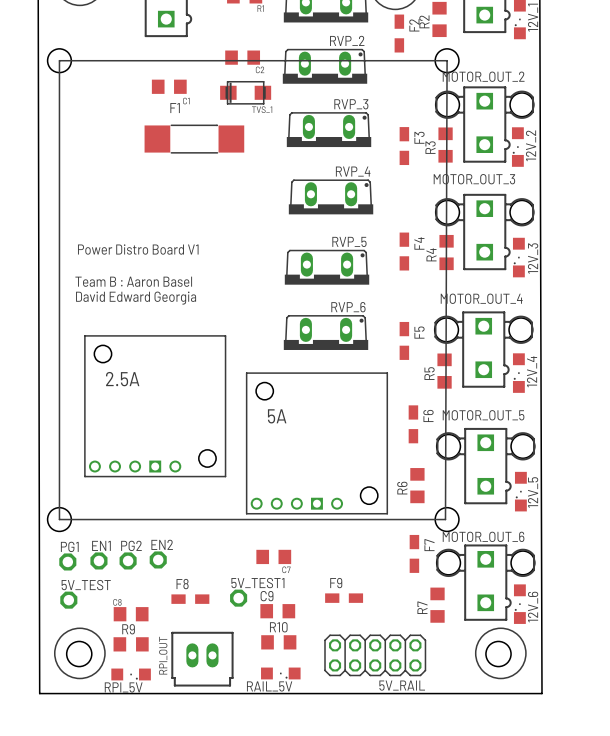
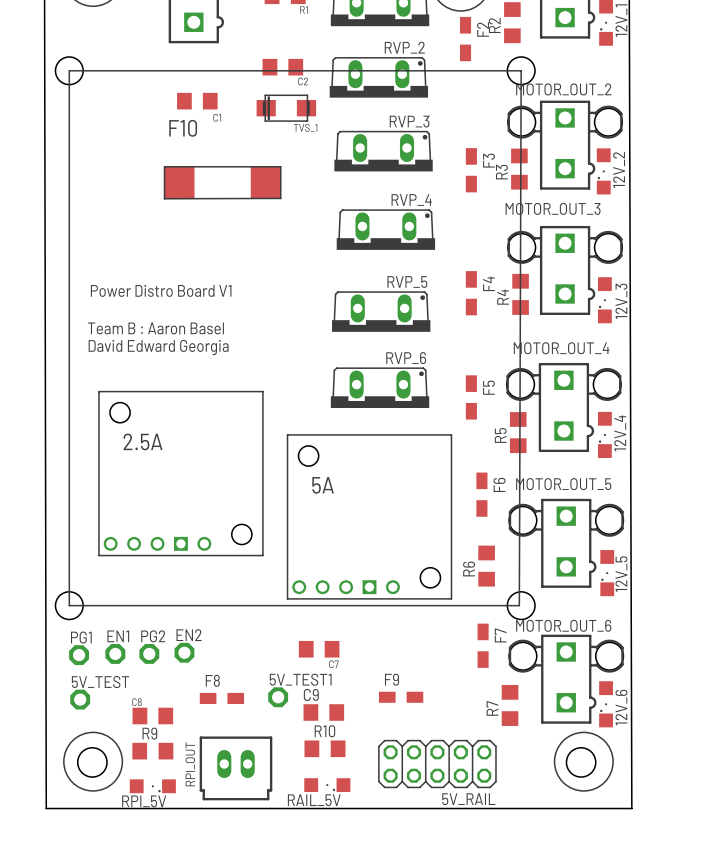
F1: (194, 139) -> none
F10: none -> (222, 182)

